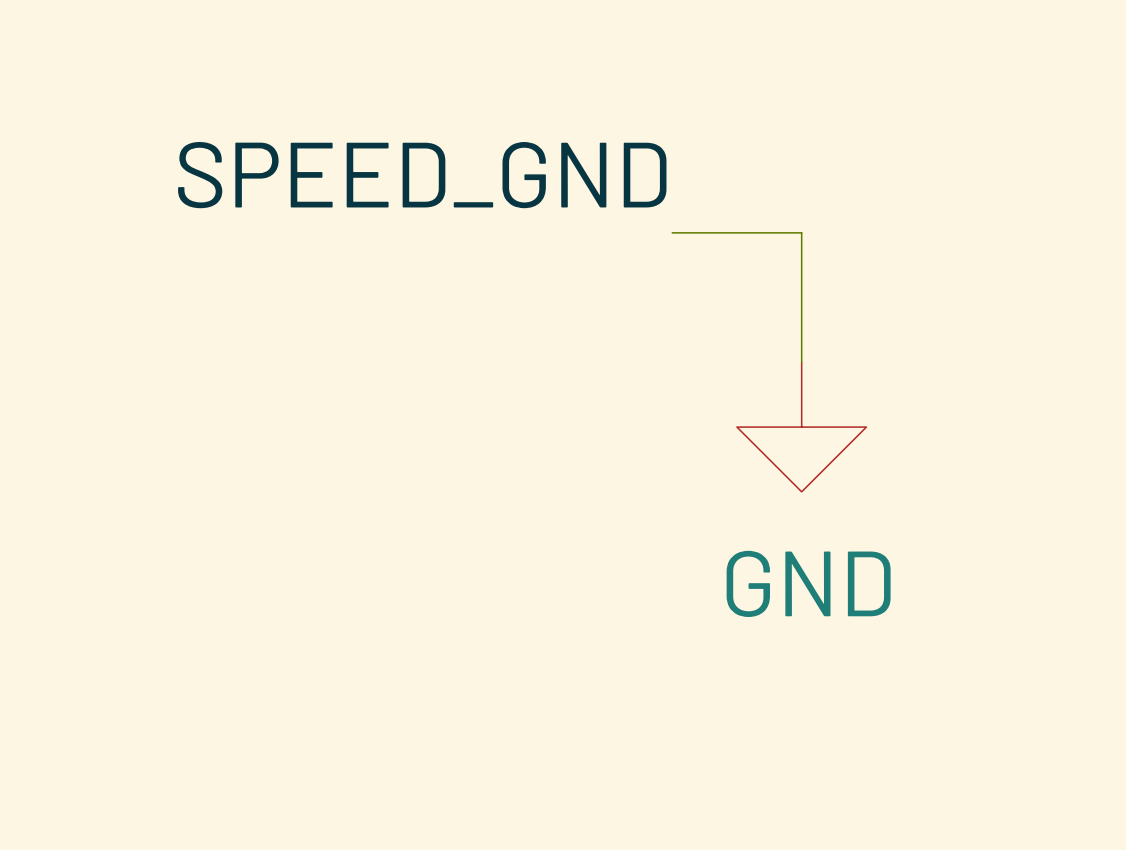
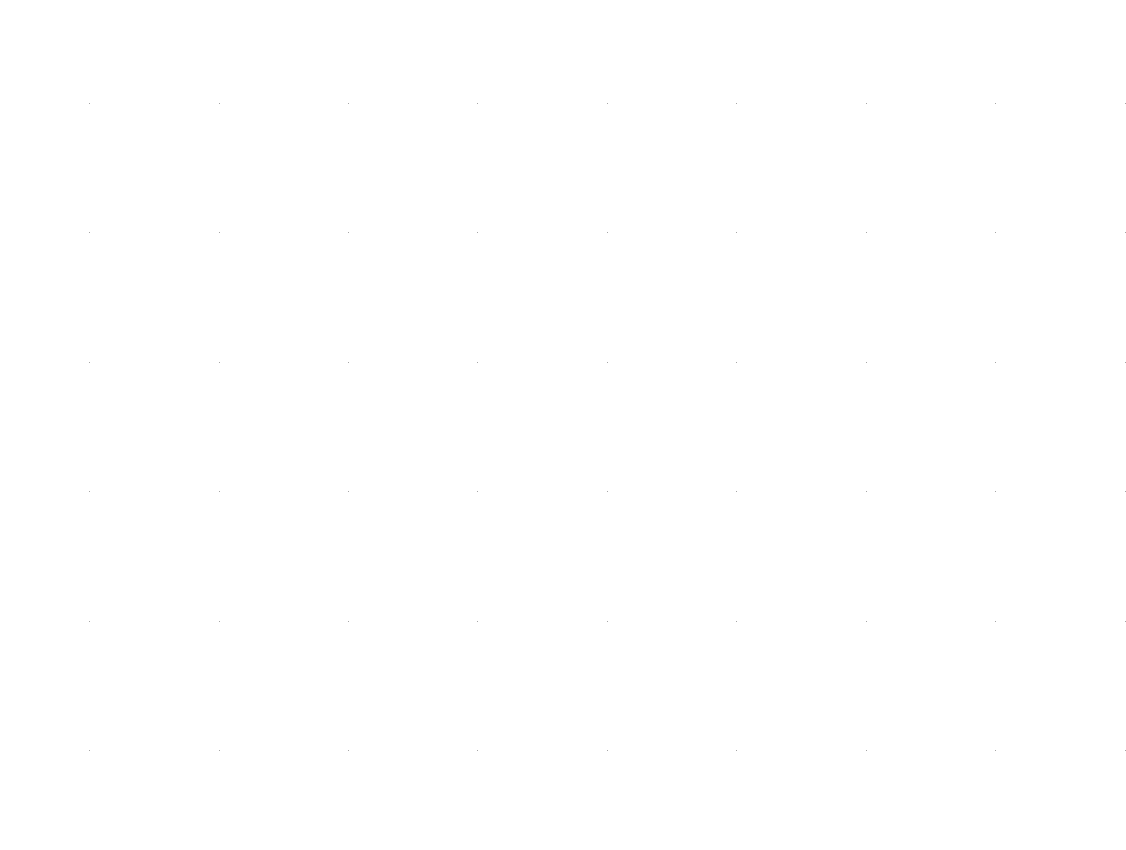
label: SPEED_GND (422, 175) -> none
wire: (672, 232) (801, 232) (801, 362) -> none
power symbol: GND (801, 427) -> none

